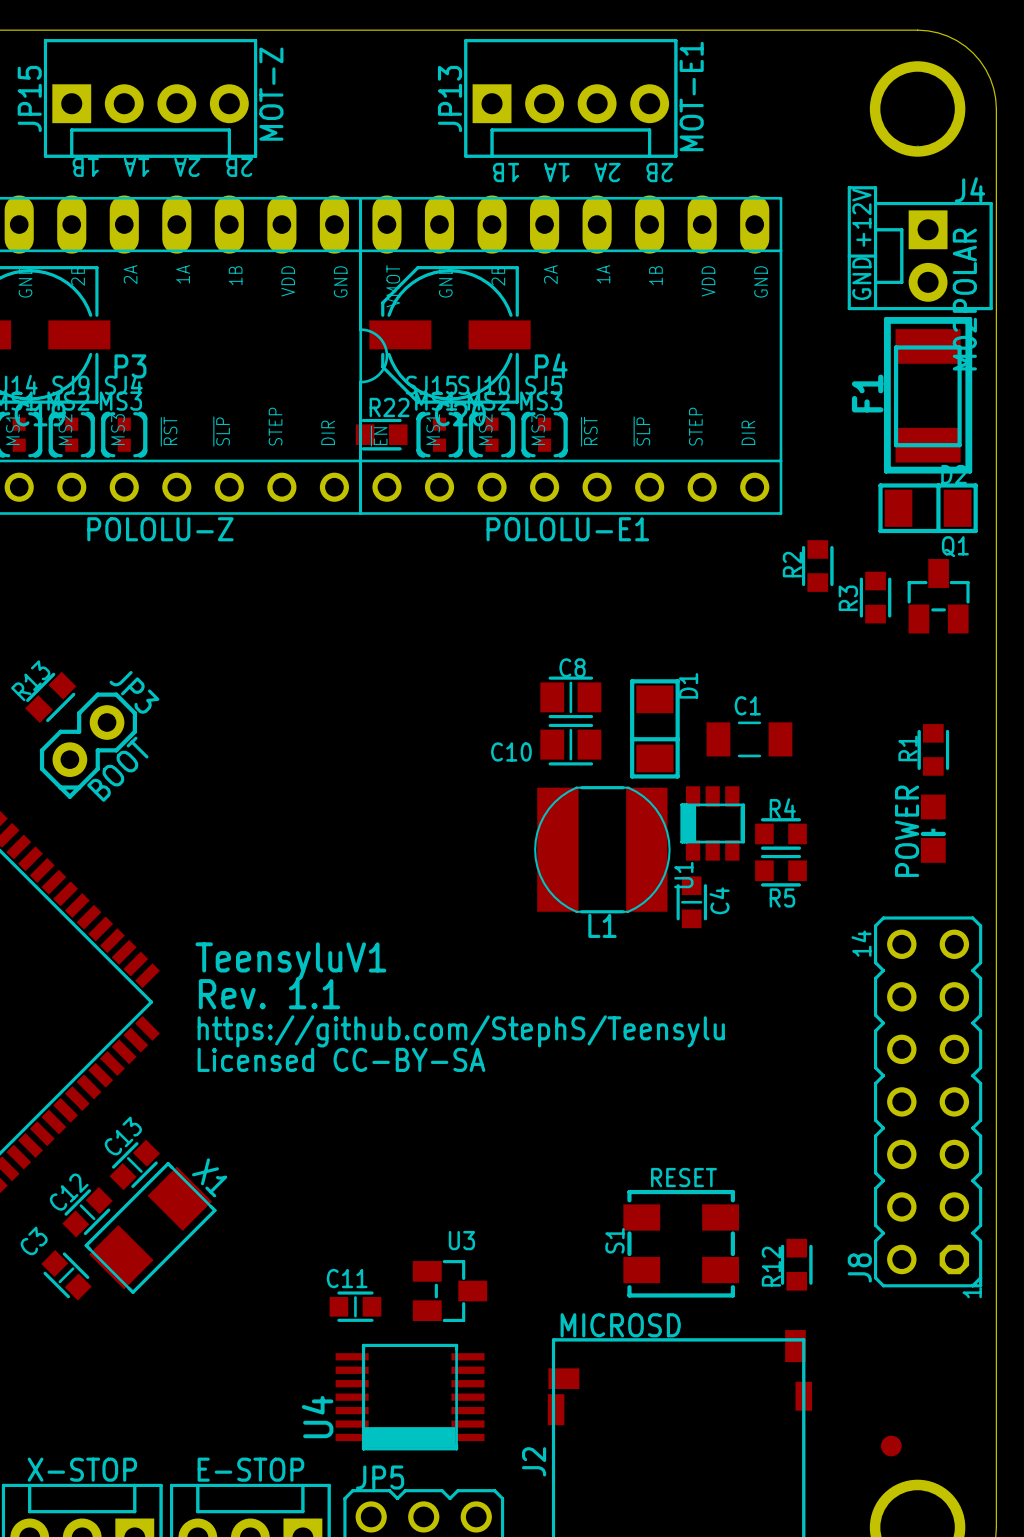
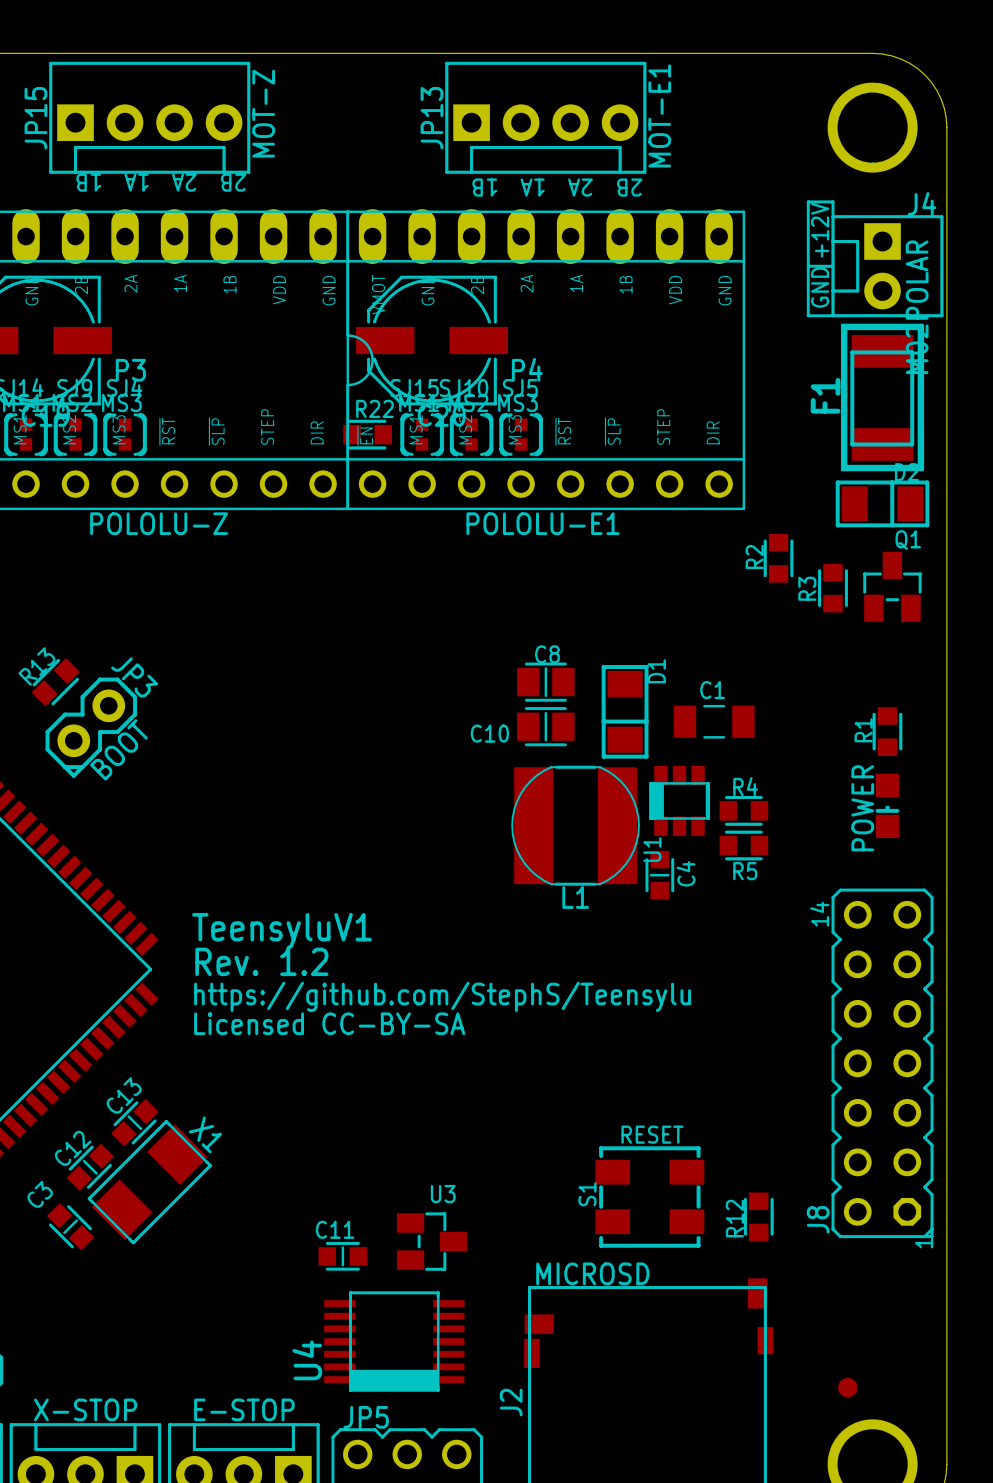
text: Rev. 1.1 (269, 994) -> Rev. 1.2 (261, 961)

